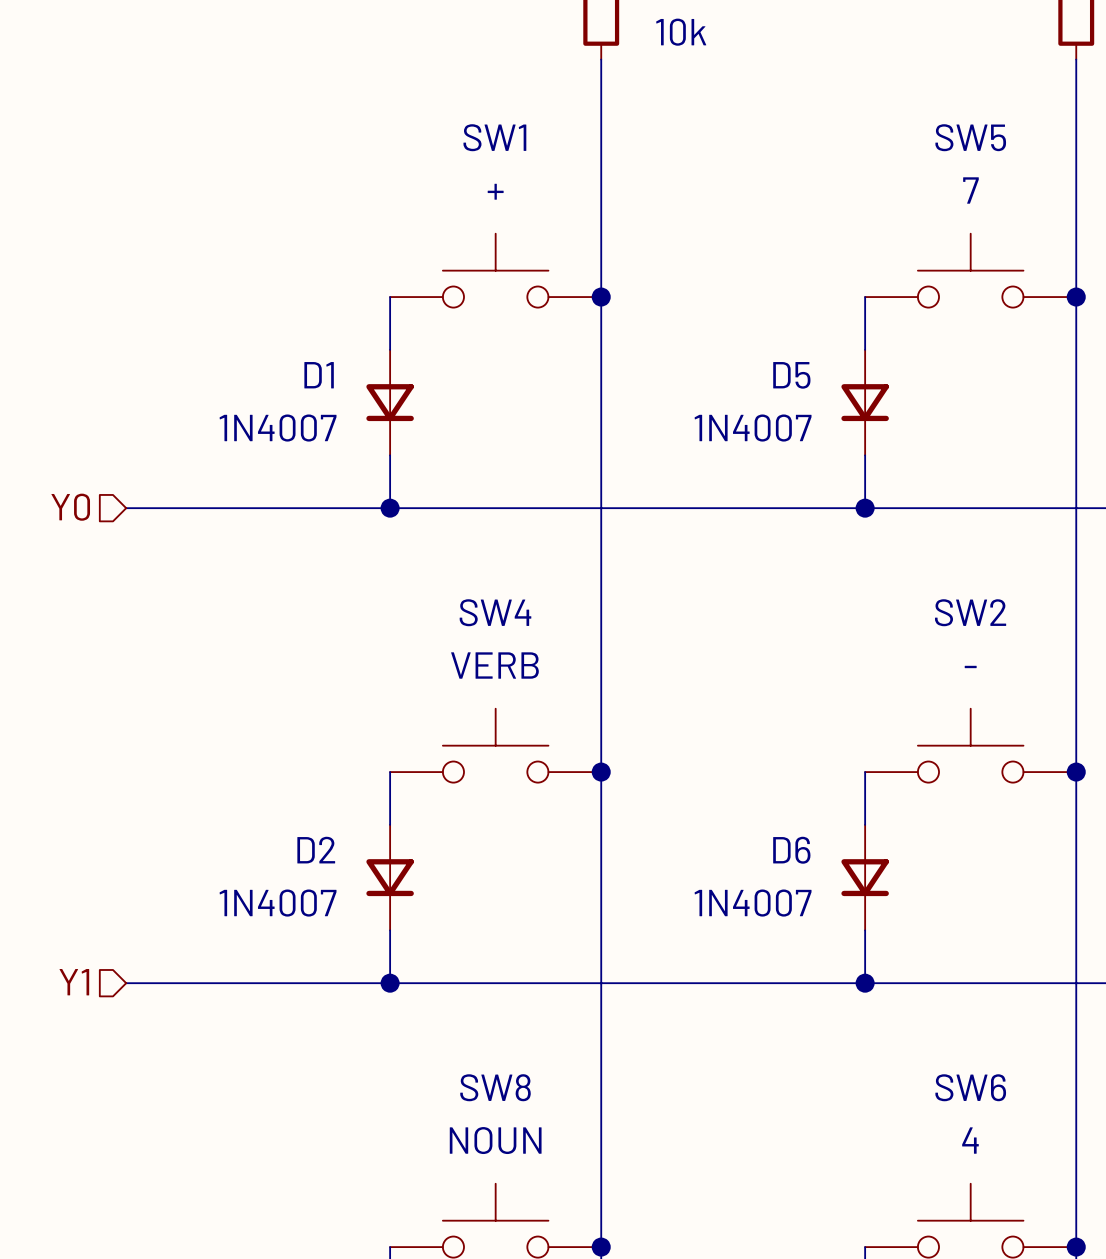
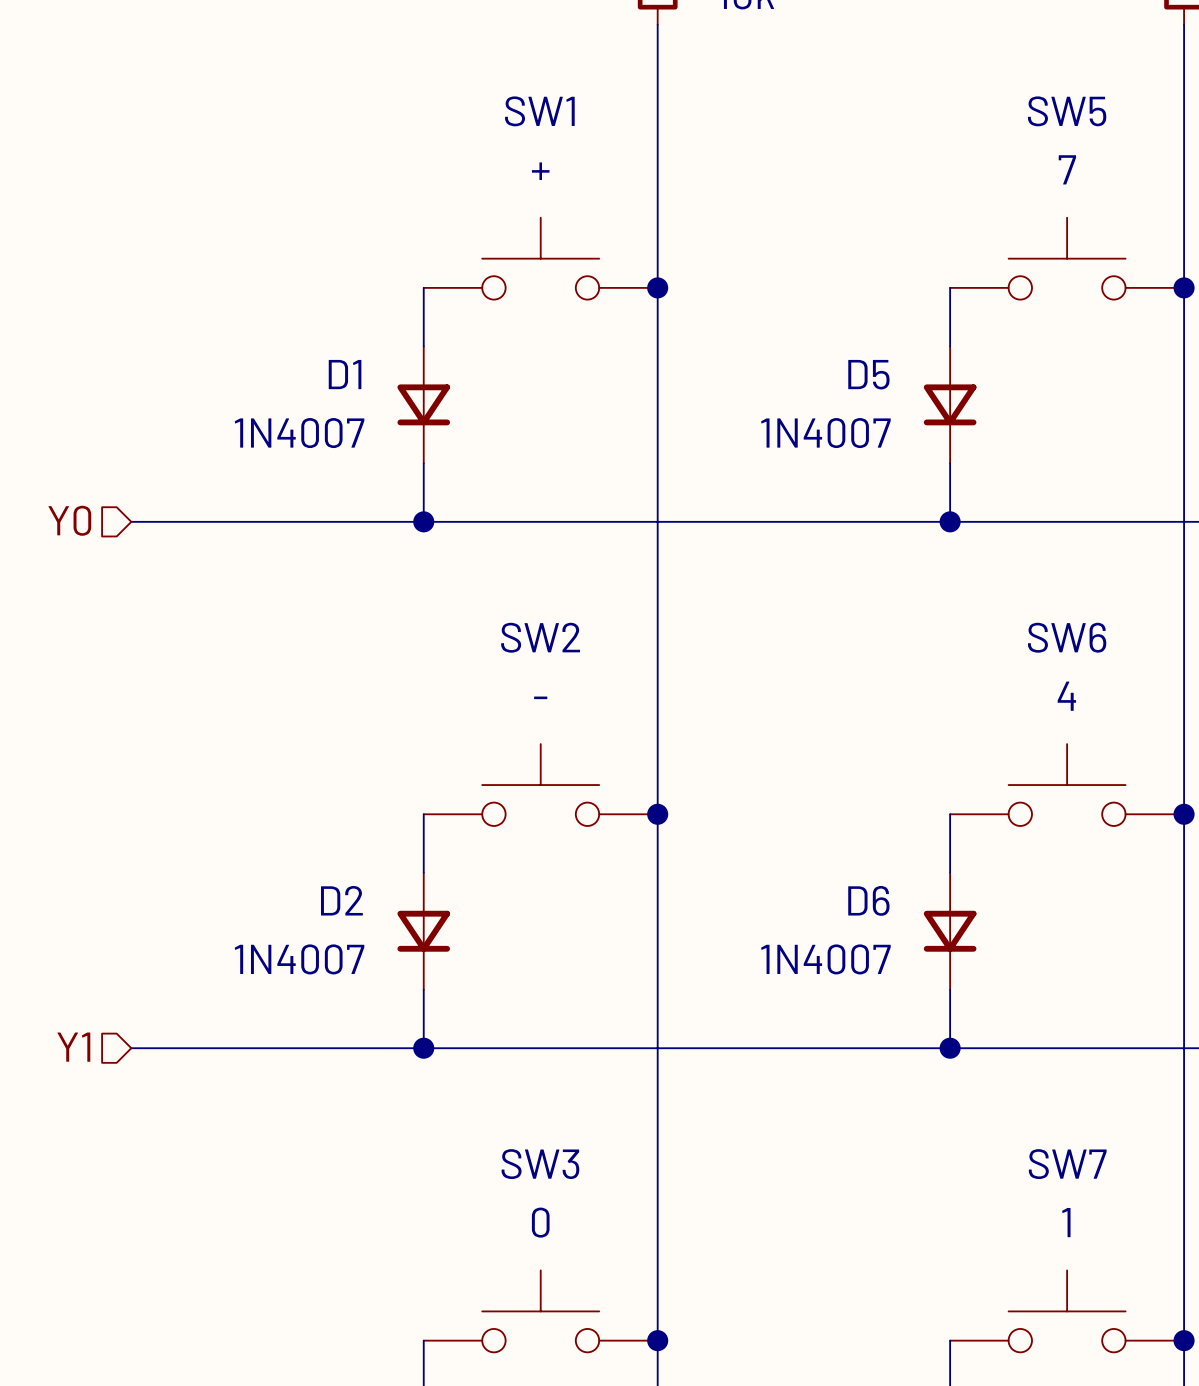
SW4 name: SW4 (495, 612) -> SW2 (540, 637)
SW2 name: SW2 (970, 612) -> SW6 (1067, 637)
SW4 value: VERB (494, 665) -> - (540, 697)
SW2 value: - (970, 666) -> 4 (1066, 696)
SW8 name: SW8 (495, 1087) -> SW3 (540, 1164)
SW6 name: SW6 (970, 1087) -> SW7 (1067, 1164)
SW8 value: NOUN (495, 1140) -> 0 (540, 1222)
SW6 value: 4 (970, 1140) -> 1 (1066, 1222)

